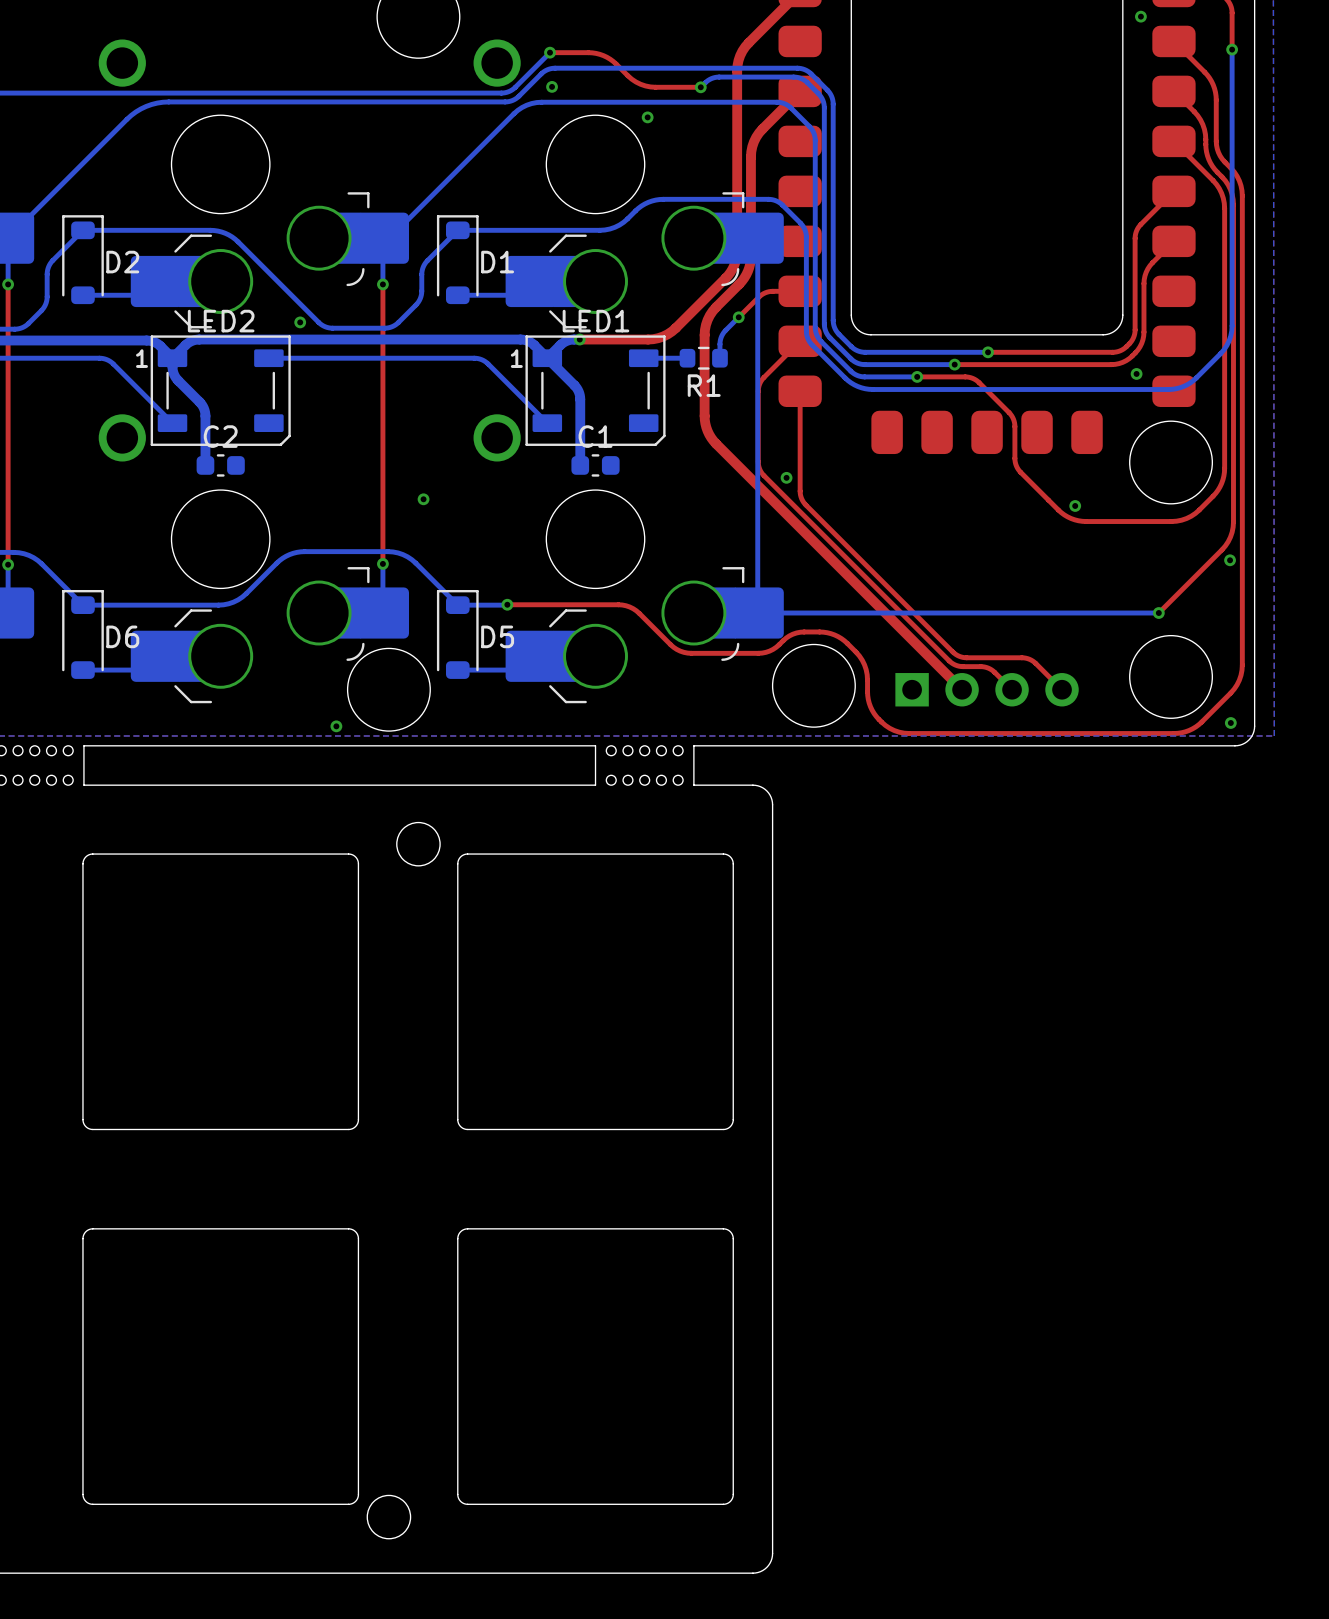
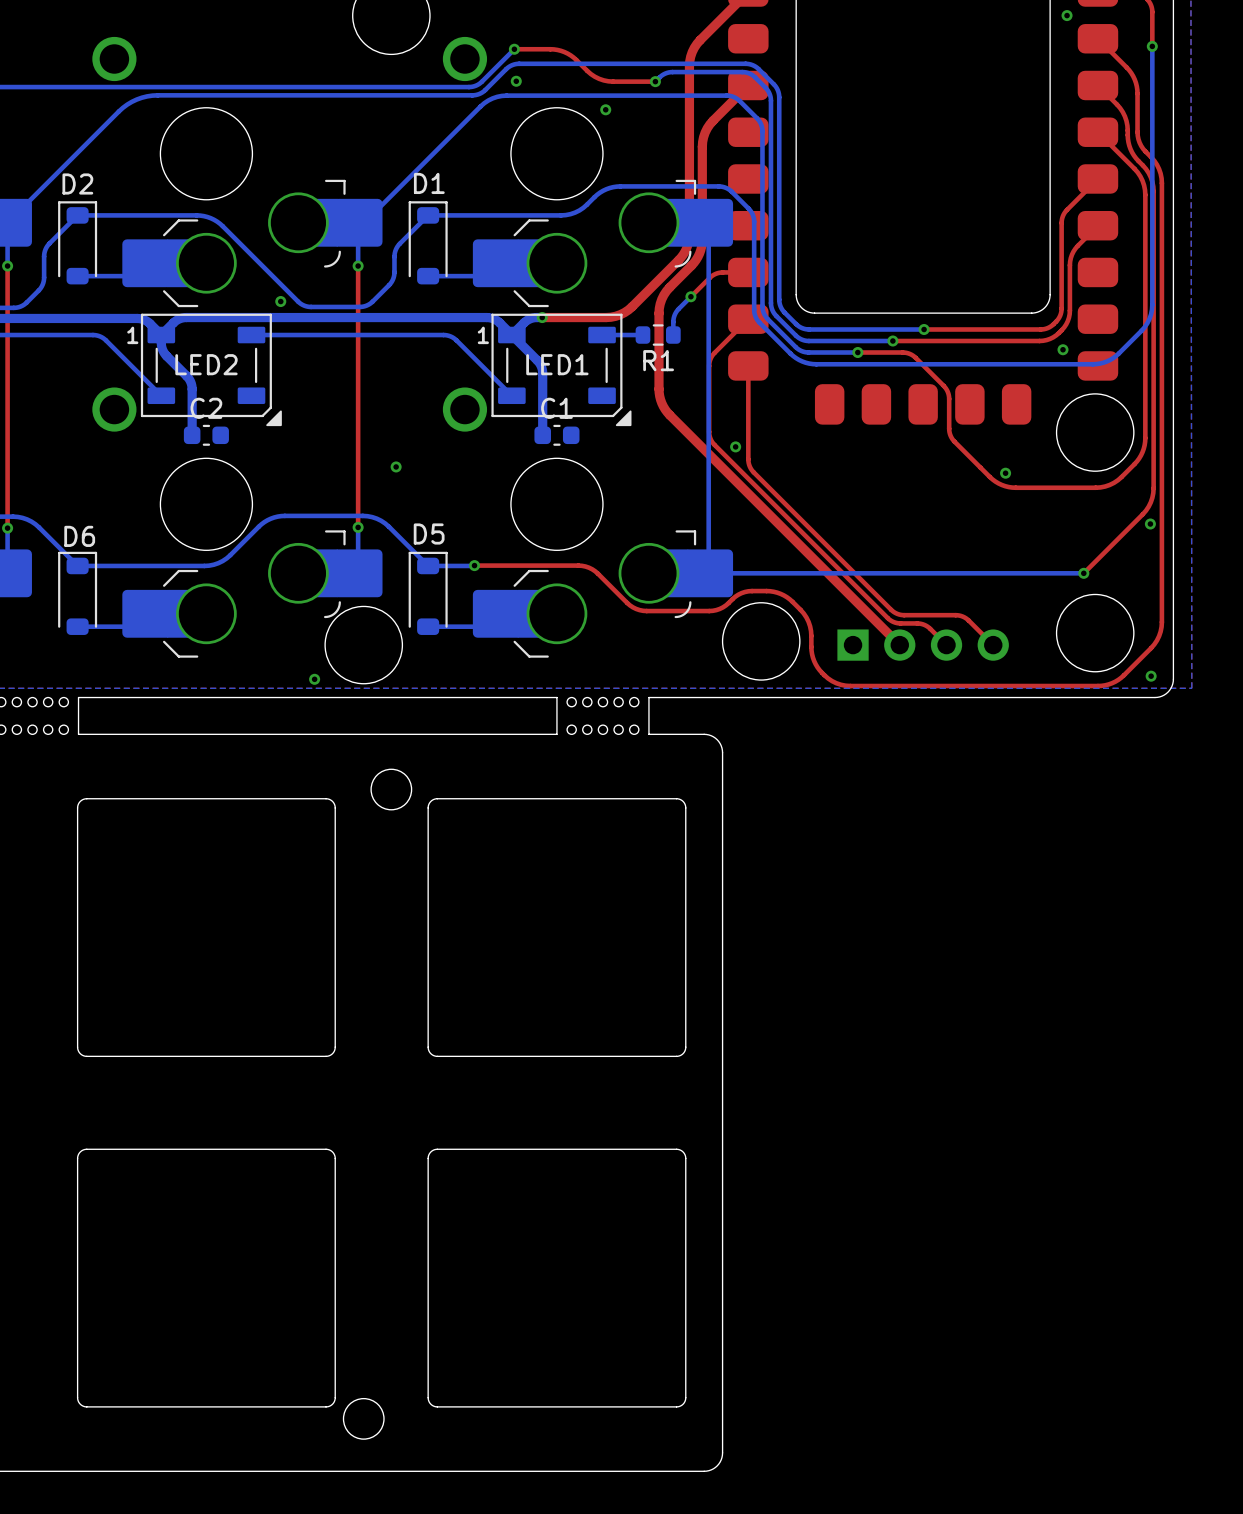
D2 name position: D2 (122, 262) -> D2 (77, 183)
D1 name position: D1 (497, 262) -> D1 (429, 183)
LED2 name position: LED2 (221, 321) -> LED2 (206, 364)
LED1 name position: LED1 (595, 321) -> LED1 (557, 364)
drawing: none -> [266, 410, 282, 427]
drawing: none -> [615, 410, 632, 427]
D6 name position: D6 (122, 636) -> D6 (79, 536)
D5 name position: D5 (497, 636) -> D5 (429, 533)

